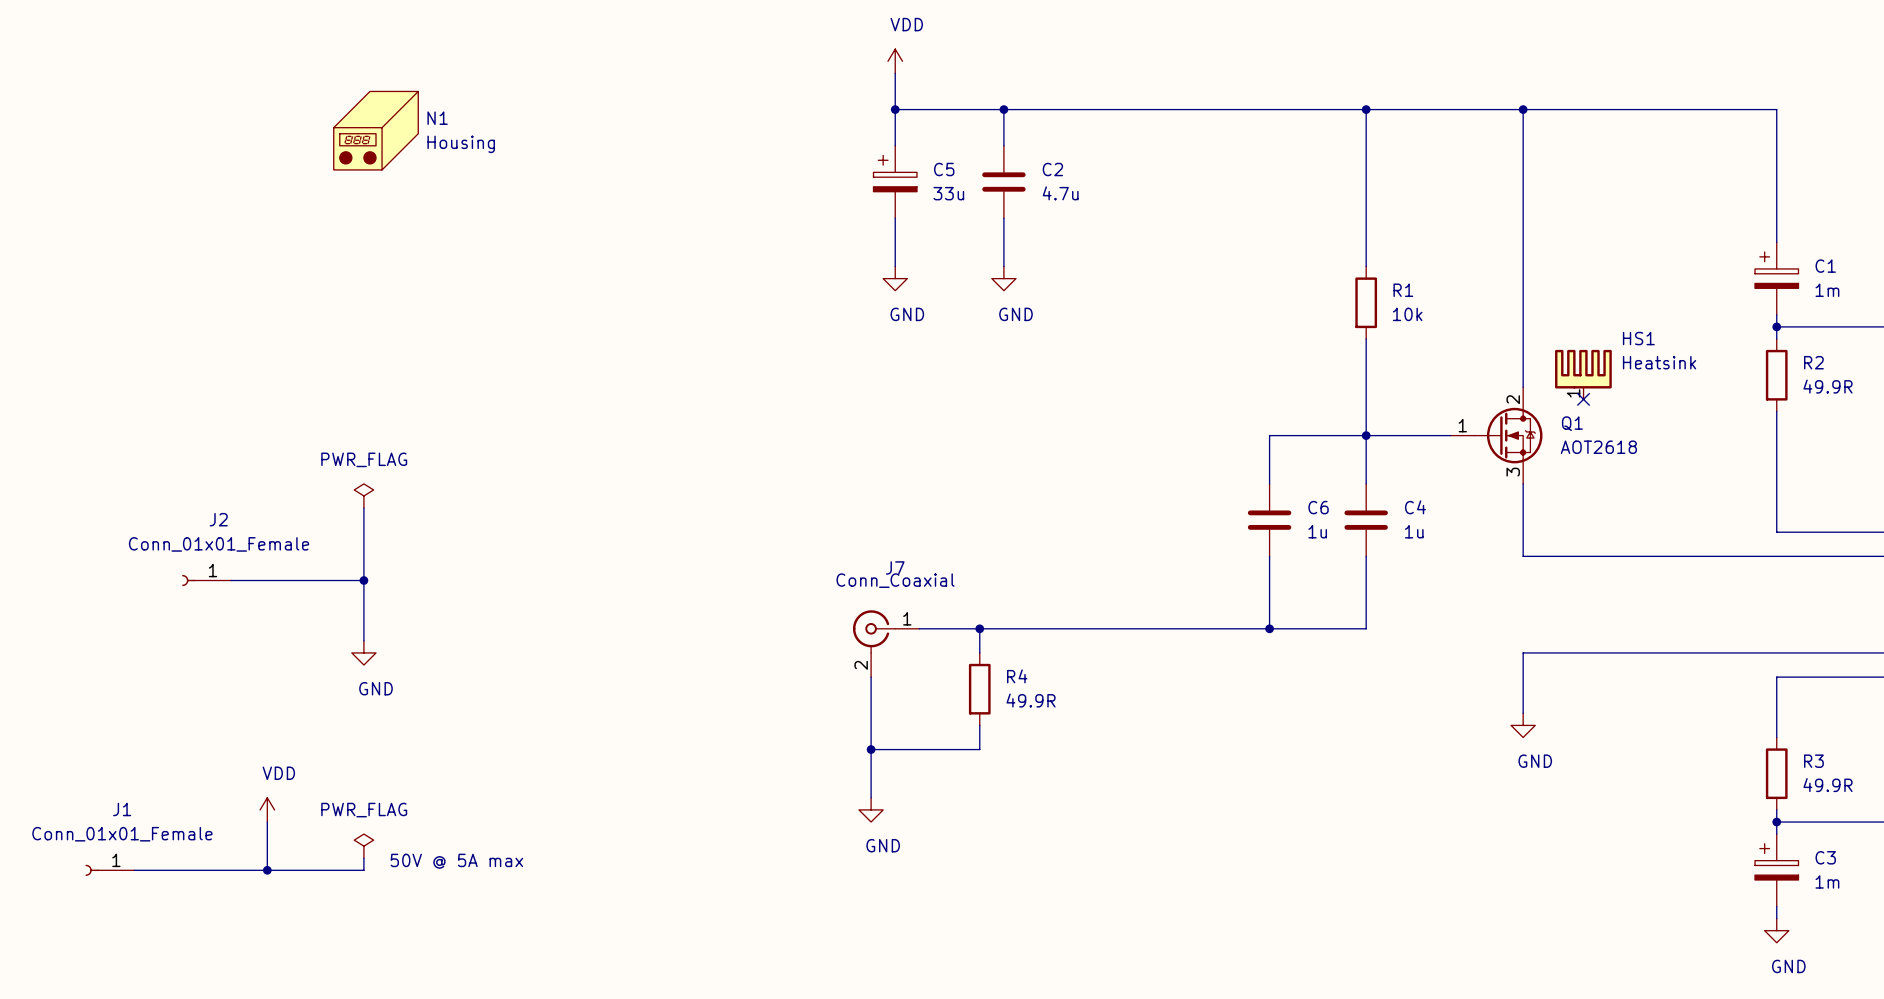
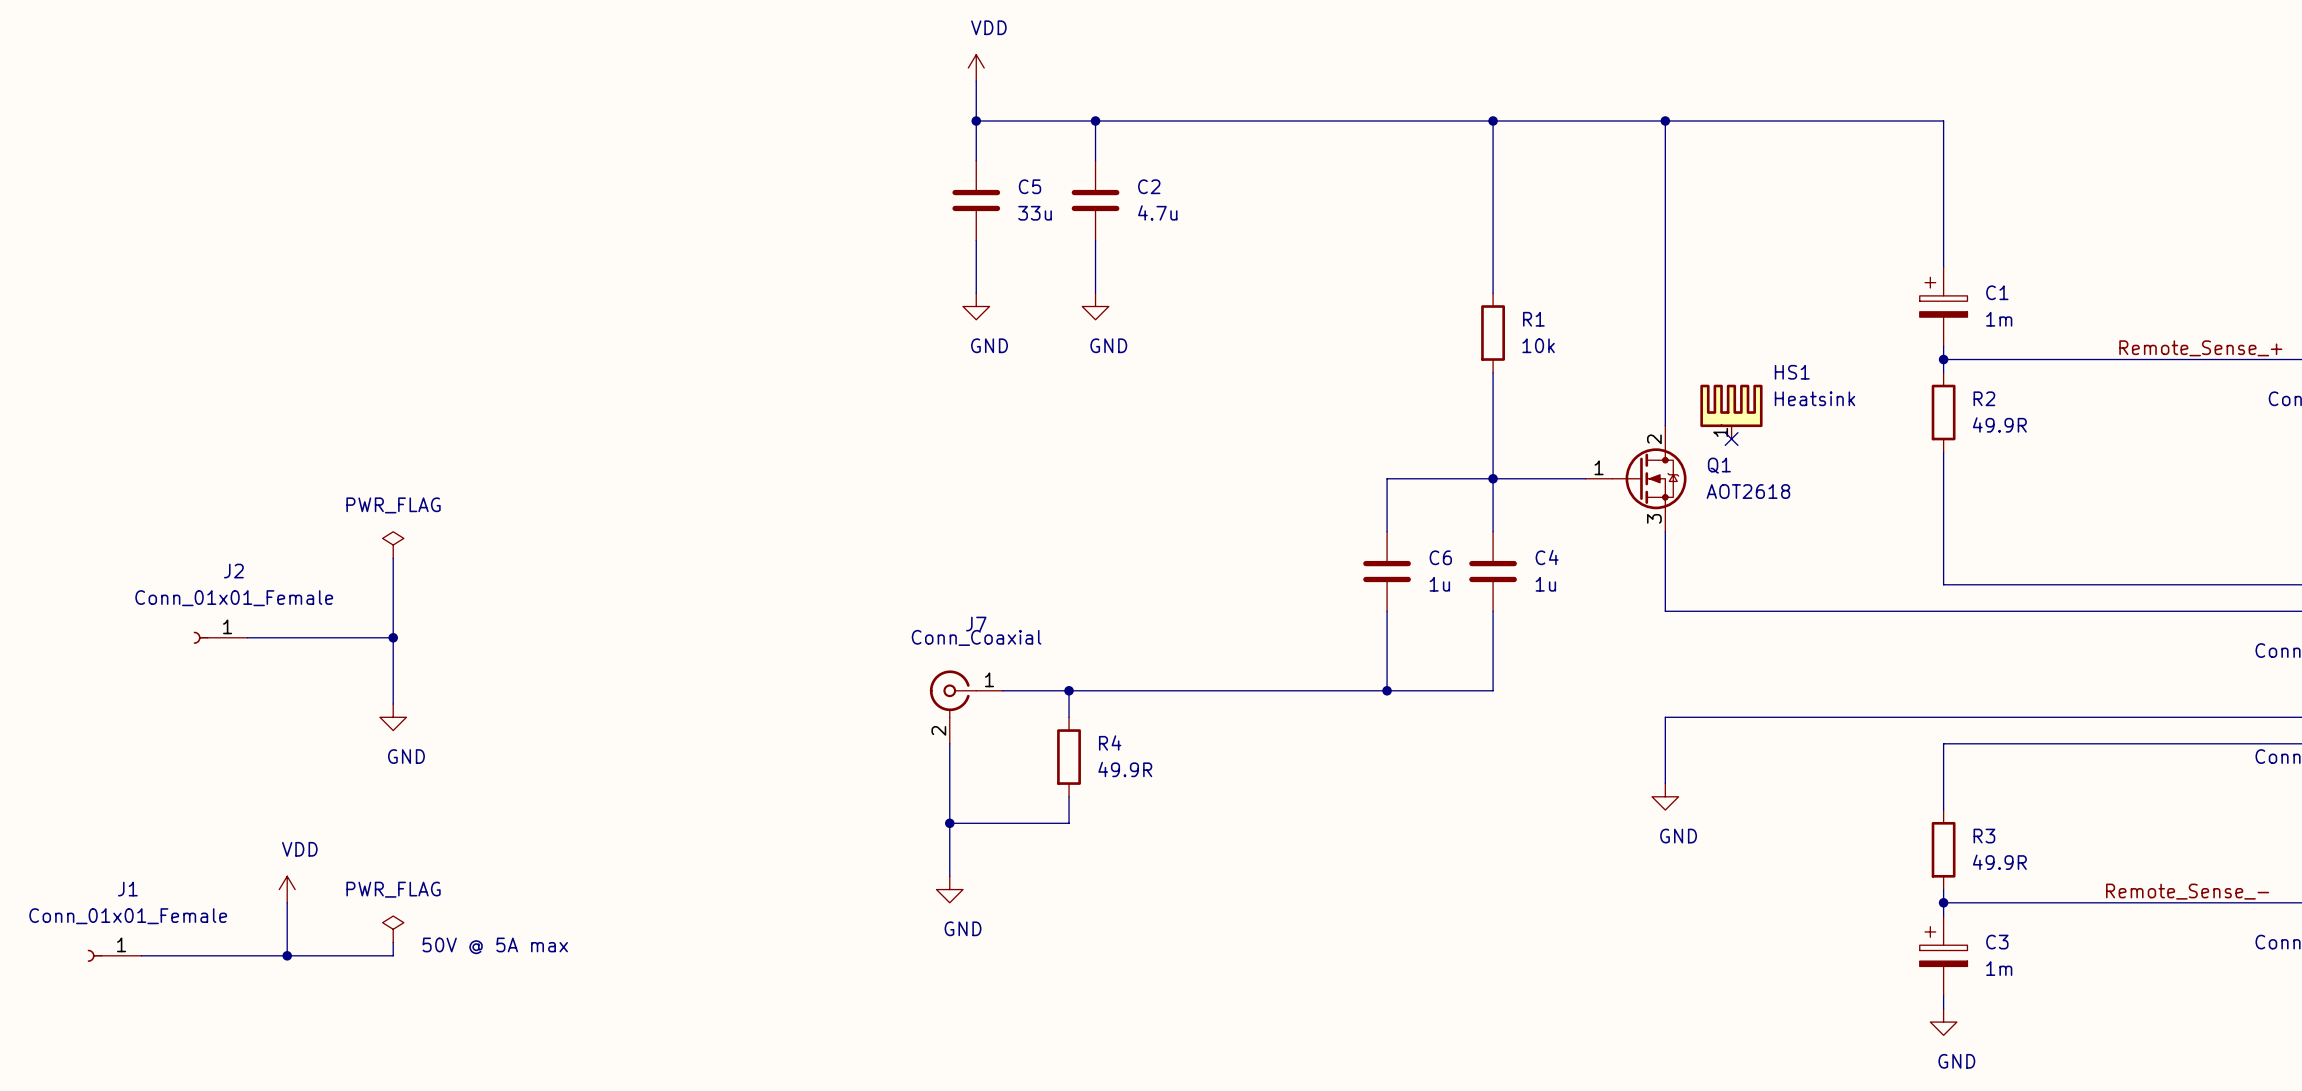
N1: Housing (376, 130) -> none
C5 symbol: [873, 145, 917, 219] -> [952, 160, 1001, 241]

